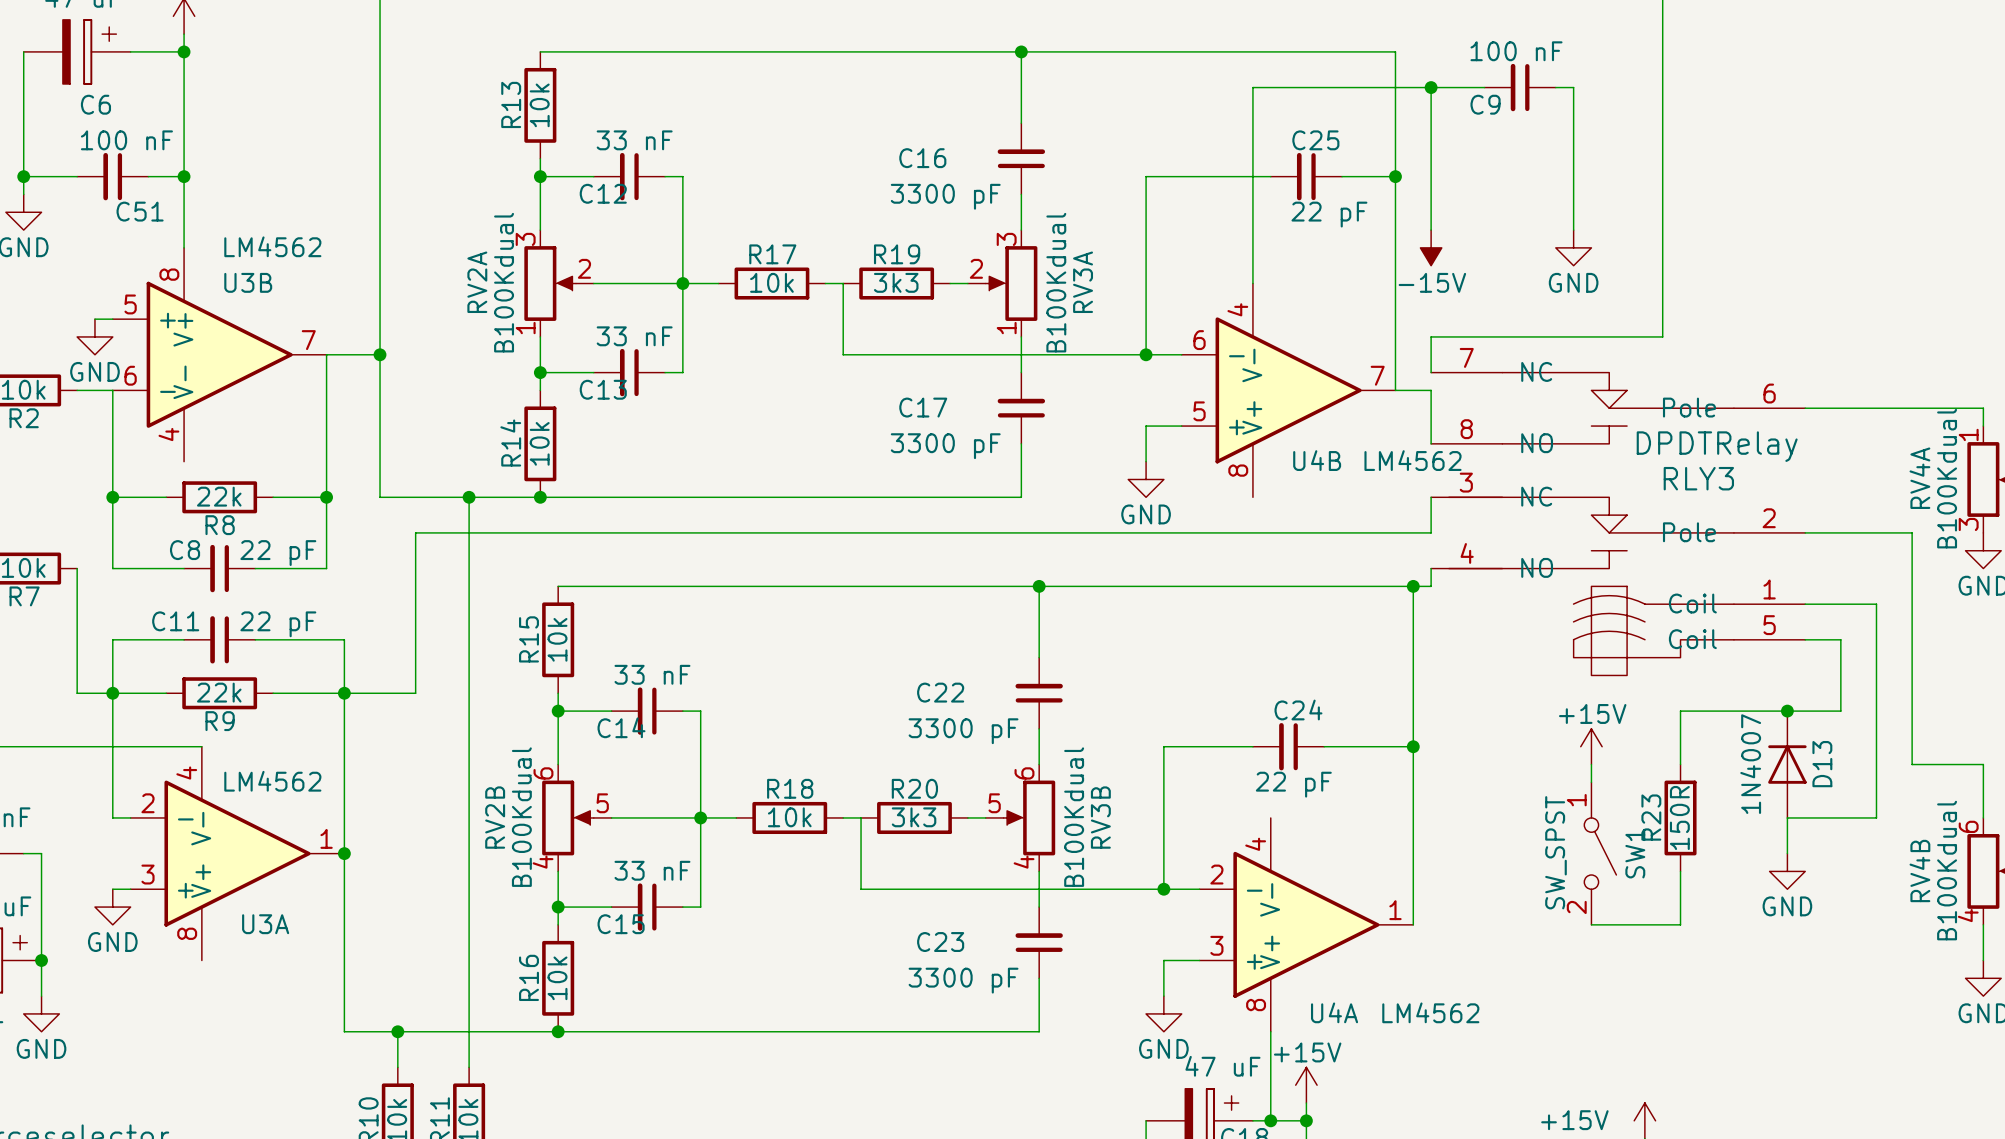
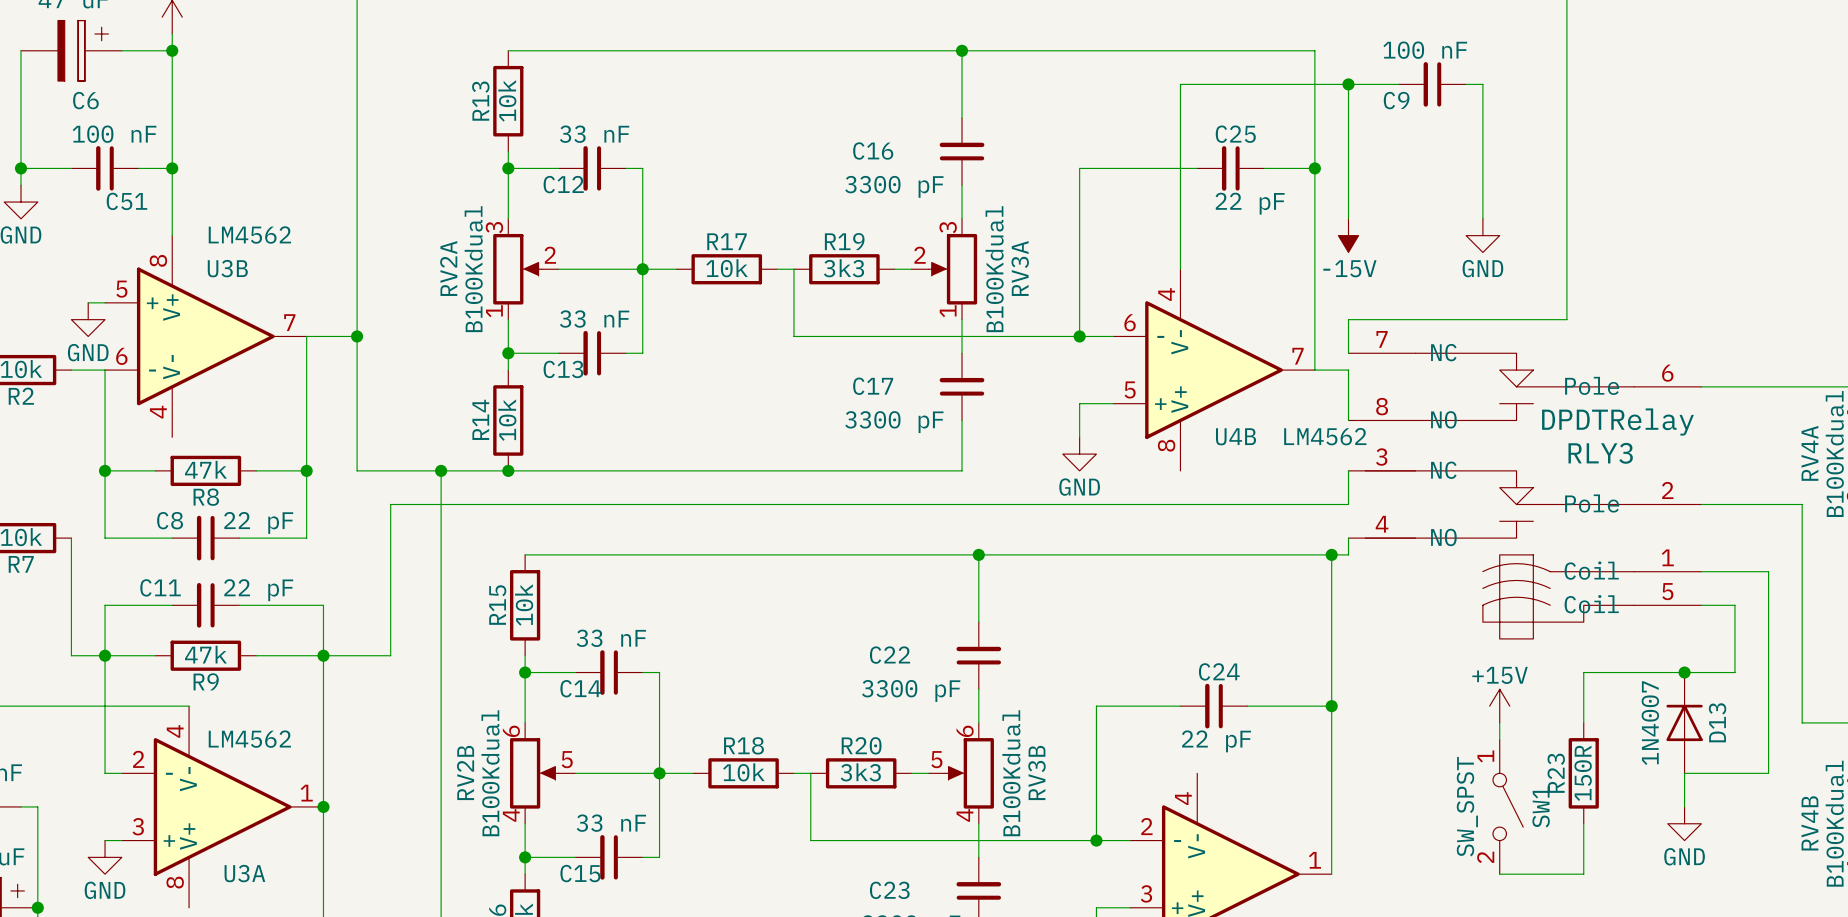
R8 value: 22k (219, 496) -> 47k (205, 469)
R9 value: 22k (219, 692) -> 47k (205, 654)

